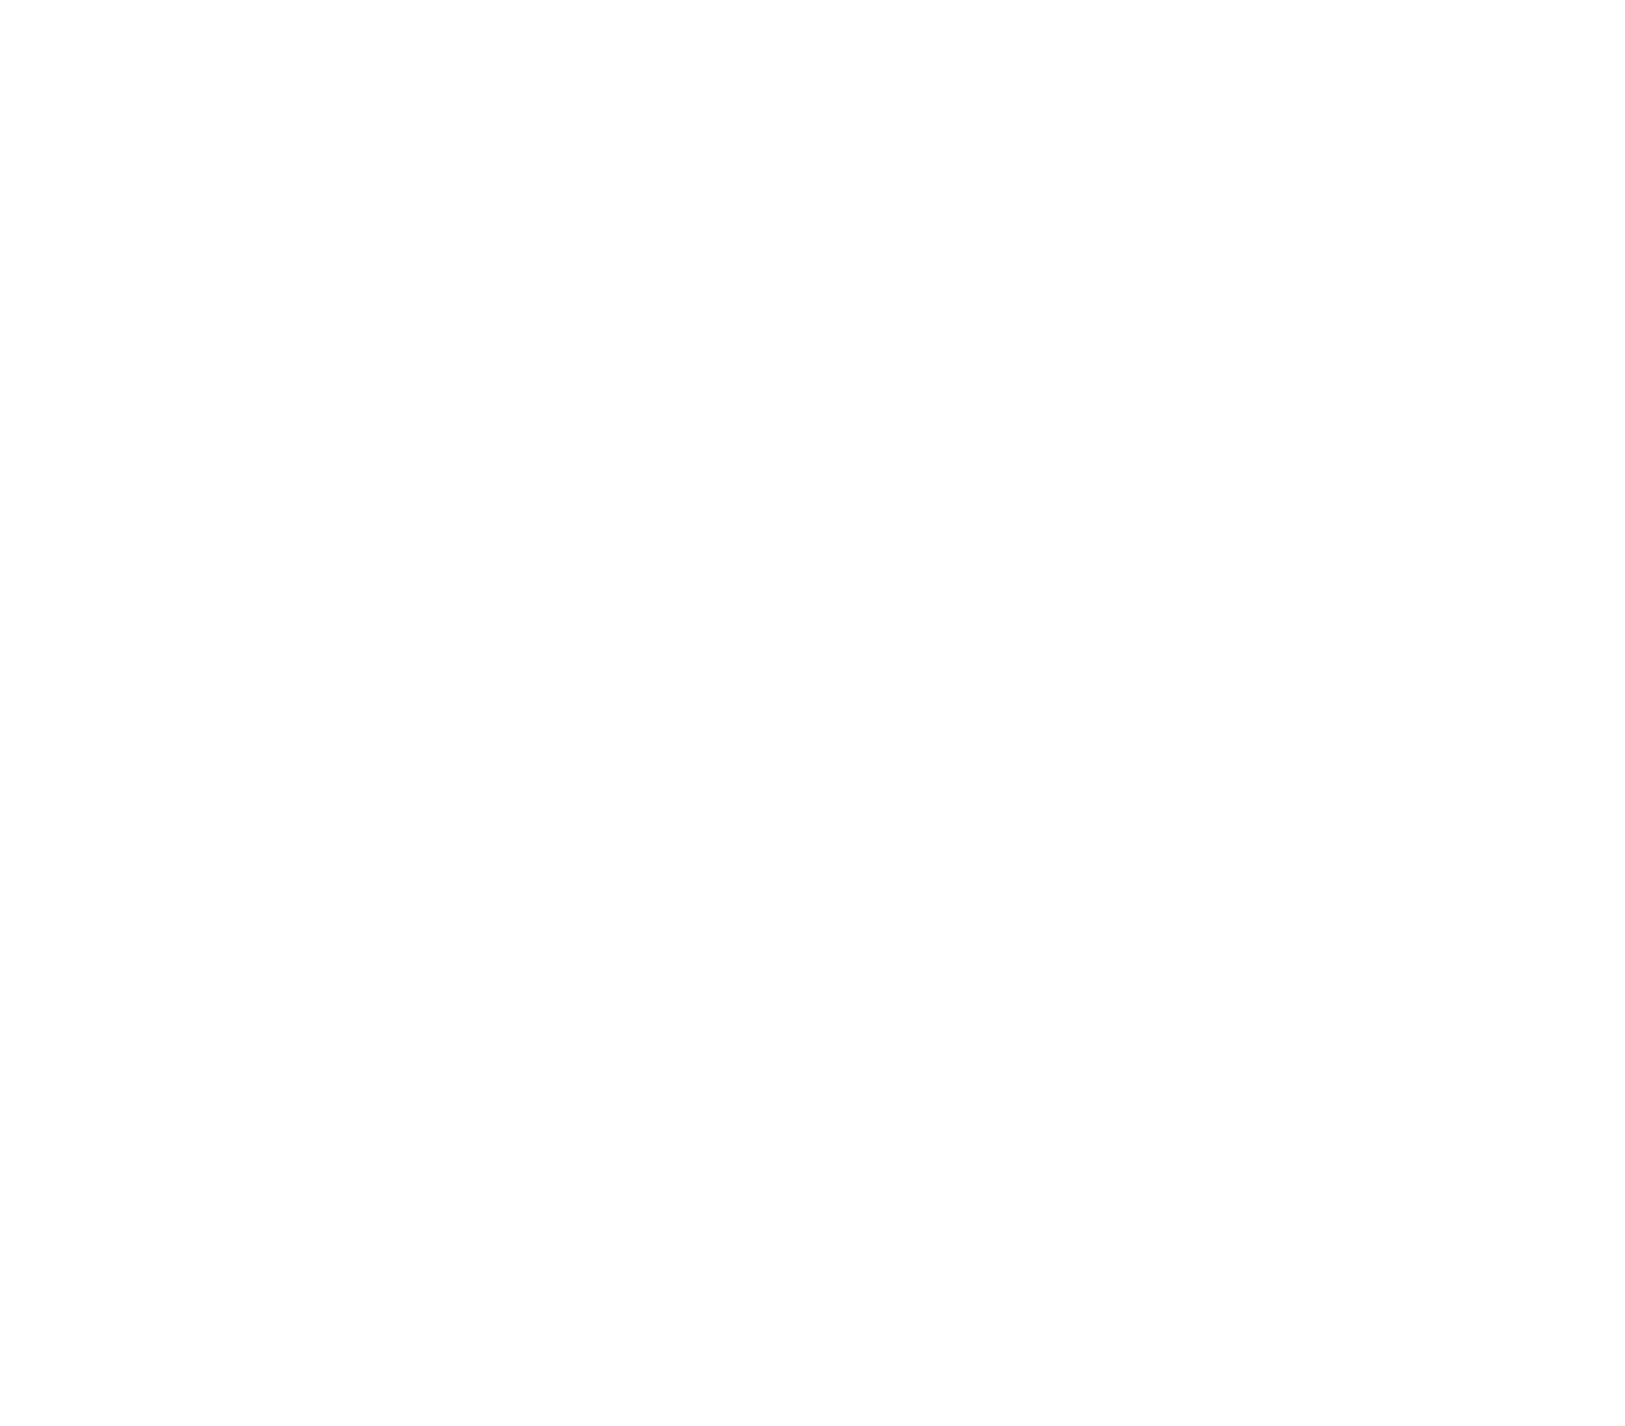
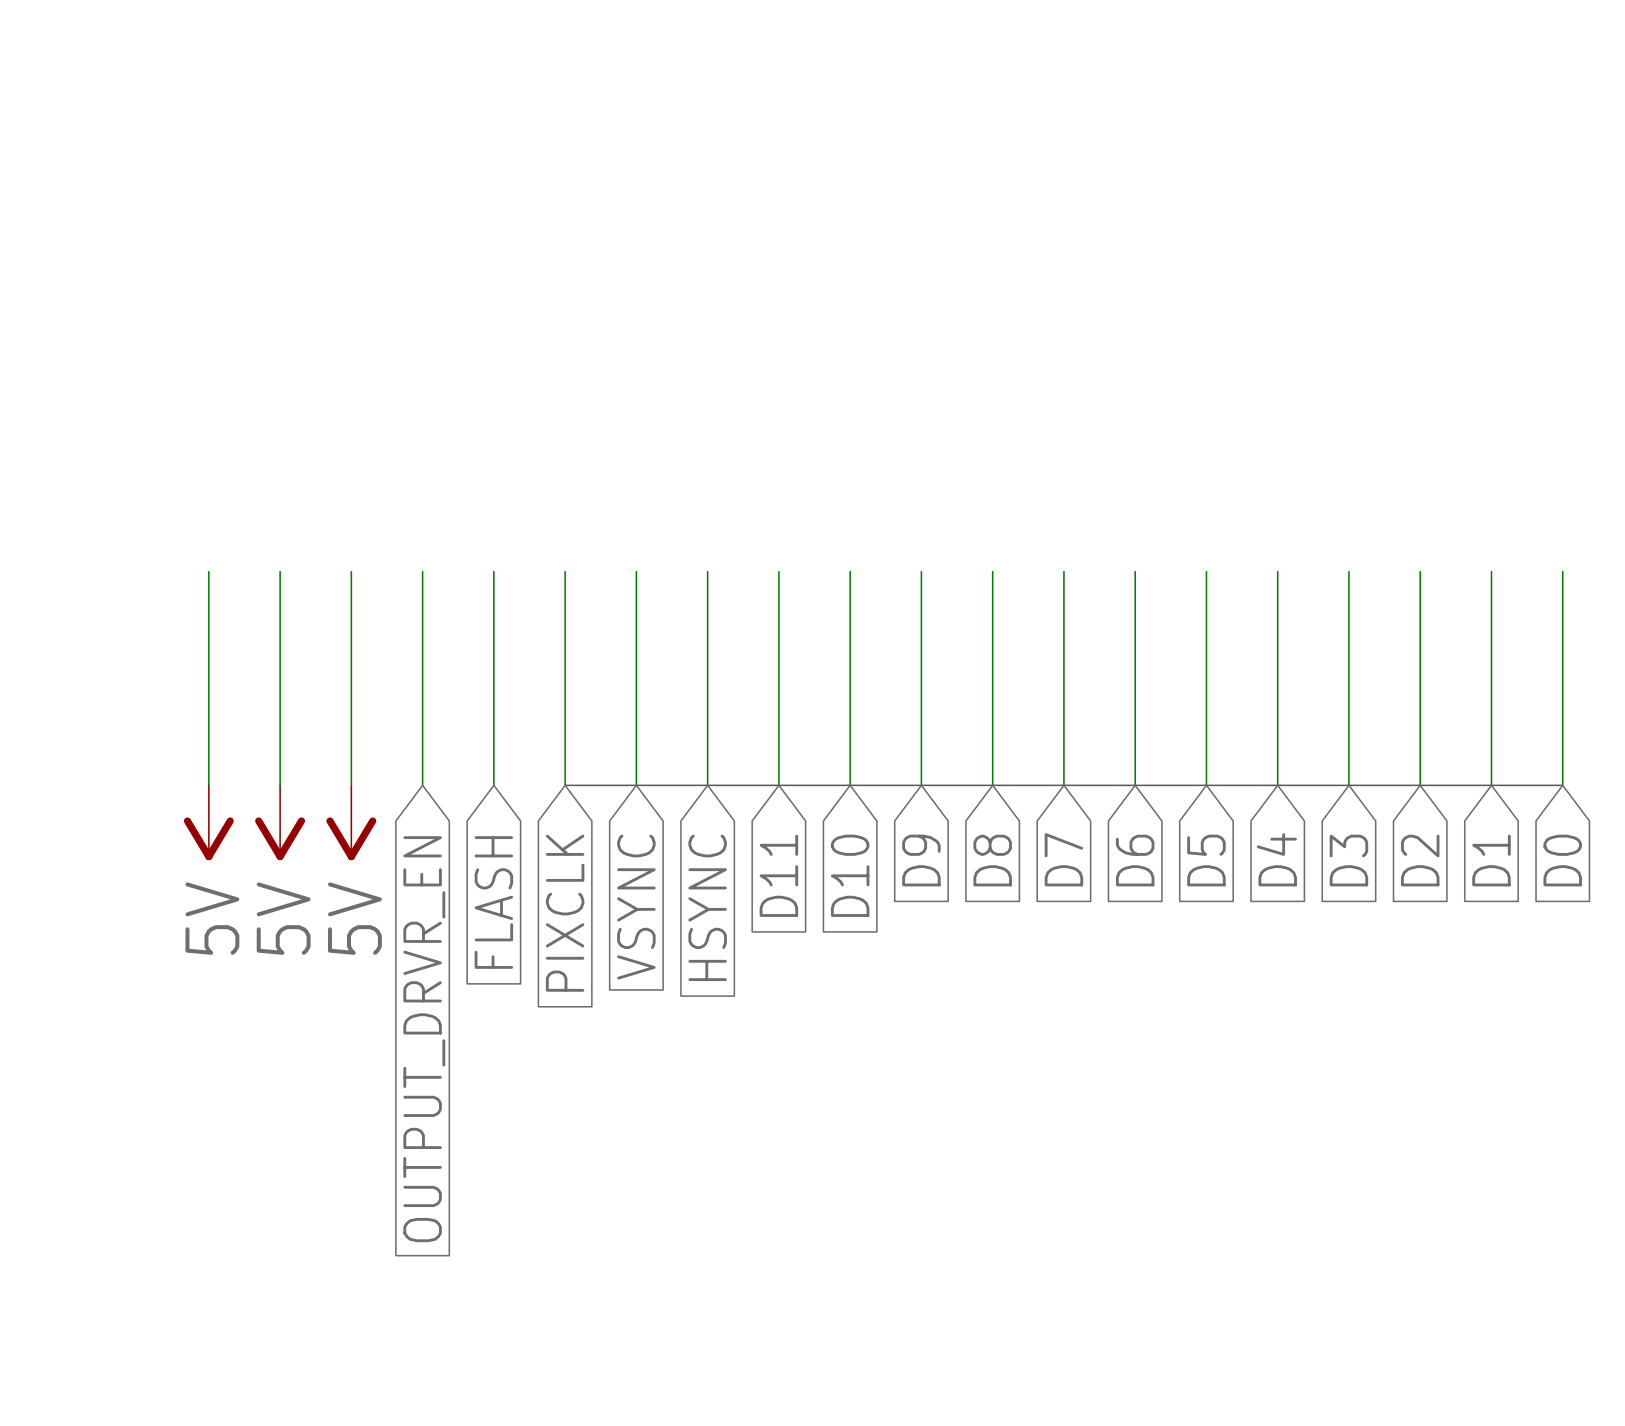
wire: none -> (208, 571) (208, 785)
wire: none -> (280, 571) (280, 785)
wire: none -> (351, 571) (351, 785)
wire: none -> (422, 571) (422, 785)
wire: none -> (493, 571) (493, 785)
wire: none -> (565, 571) (565, 785)
wire: none -> (636, 571) (636, 785)
wire: none -> (707, 571) (707, 785)
wire: none -> (778, 571) (778, 785)
wire: none -> (850, 571) (850, 785)
wire: none -> (921, 571) (921, 785)
wire: none -> (992, 571) (992, 785)
wire: none -> (1063, 571) (1063, 785)
wire: none -> (1135, 571) (1135, 785)
wire: none -> (1206, 571) (1206, 785)
wire: none -> (1277, 571) (1277, 785)
wire: none -> (1348, 571) (1348, 785)
wire: none -> (1420, 571) (1420, 785)
wire: none -> (1491, 571) (1491, 785)
wire: none -> (1562, 571) (1562, 785)
bus: none -> (565, 785) (1562, 785)
power symbol: none -> 5V (208, 822)
power symbol: none -> 5V (280, 822)
power symbol: none -> 5V (351, 822)
global label: none -> D7 (1063, 859)
global label: none -> D4 (1276, 859)
global label: none -> D9 (921, 860)
global label: none -> D8 (992, 860)
global label: none -> D6 (1135, 860)
global label: none -> D5 (1206, 860)
global label: none -> D3 (1348, 860)
global label: none -> D2 (1420, 860)
global label: none -> D1 (1491, 860)
global label: none -> D0 (1562, 860)
global label: none -> D11 (778, 875)
global label: none -> D10 (850, 875)
global label: none -> FLASH (493, 902)
global label: none -> VSYNC (636, 907)
global label: none -> HSYNC (707, 907)
global label: none -> PIXCLK (565, 913)
global label: none -> OUTPUT_DRVR_EN (424, 1039)

